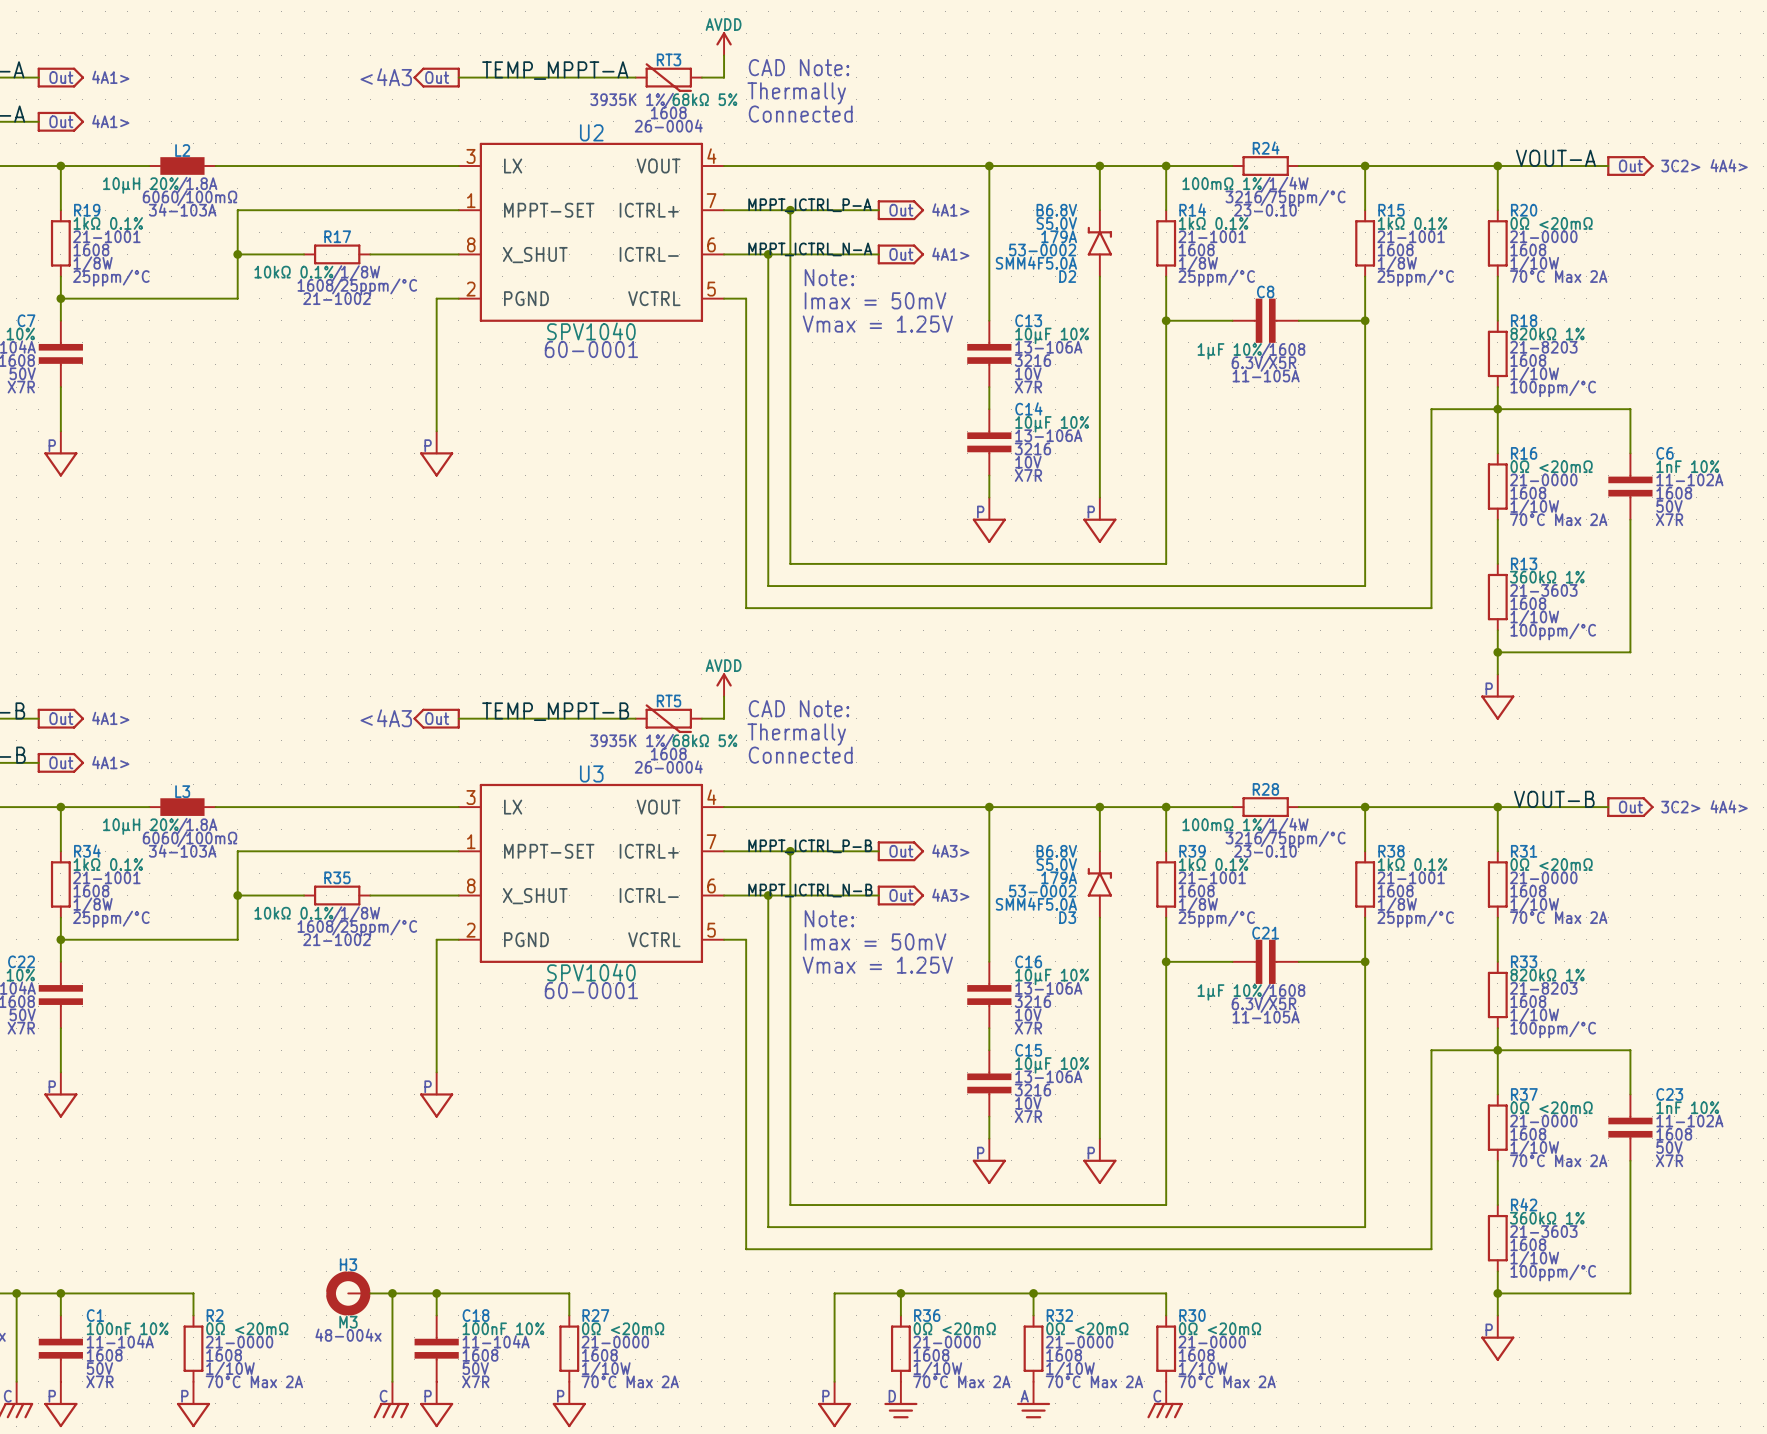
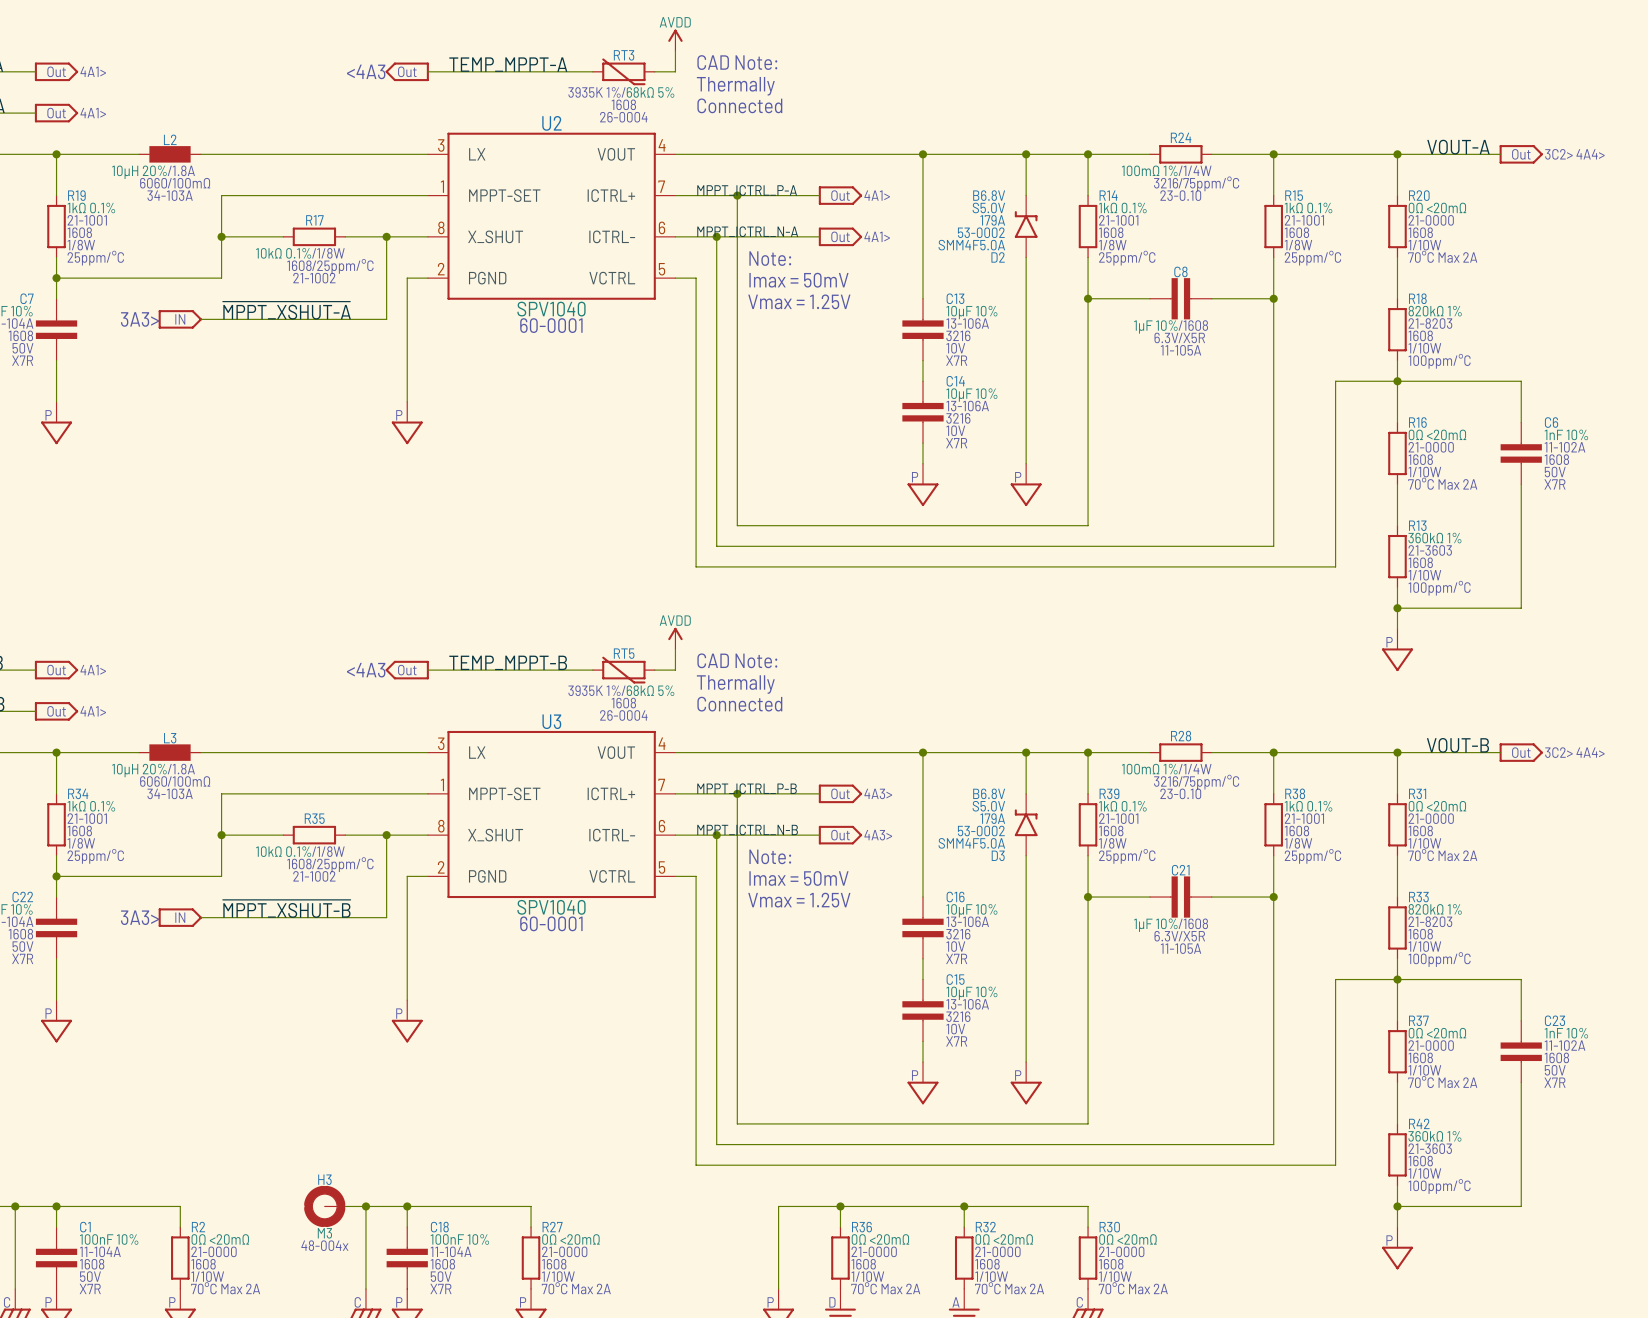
wire: none -> (386, 236) (386, 319) (200, 319)
junction: none -> (386, 236)
label: none -> ~{MPPT_XSHUT-A} (286, 310)
text: none -> 3A3> (139, 319)
part: none -> (180, 319)
wire: none -> (386, 835) (386, 917) (200, 917)
junction: none -> (386, 835)
label: none -> ~{MPPT_XSHUT-B} (286, 908)
text: none -> 3A3> (139, 917)
part: none -> (180, 917)

